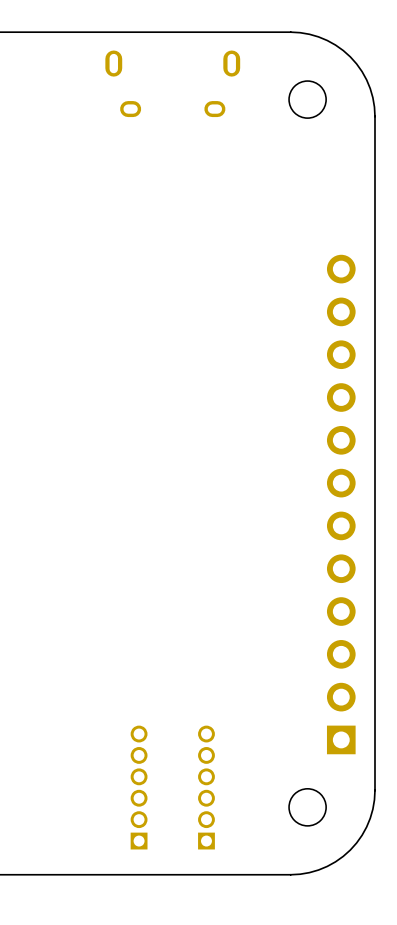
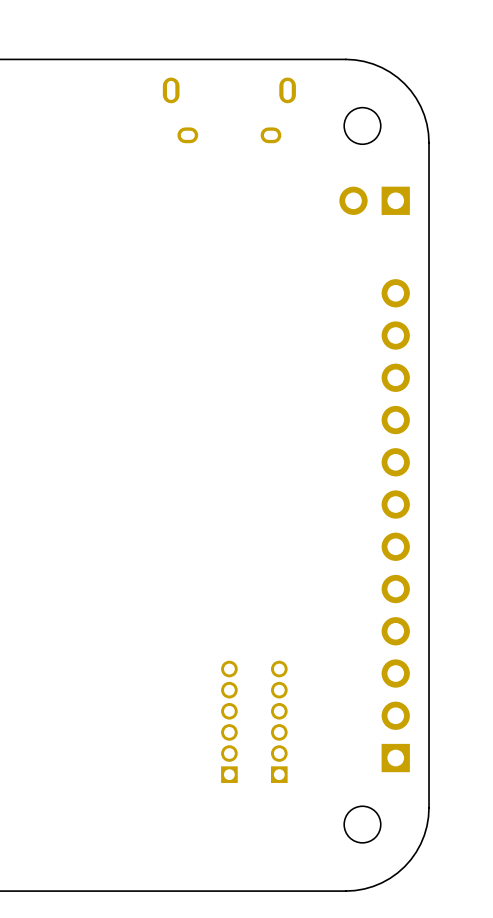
part: none -> (374, 200)
part: none -> (229, 721)
part: none -> (279, 721)
part: (139, 787) -> none
part: (206, 787) -> none

